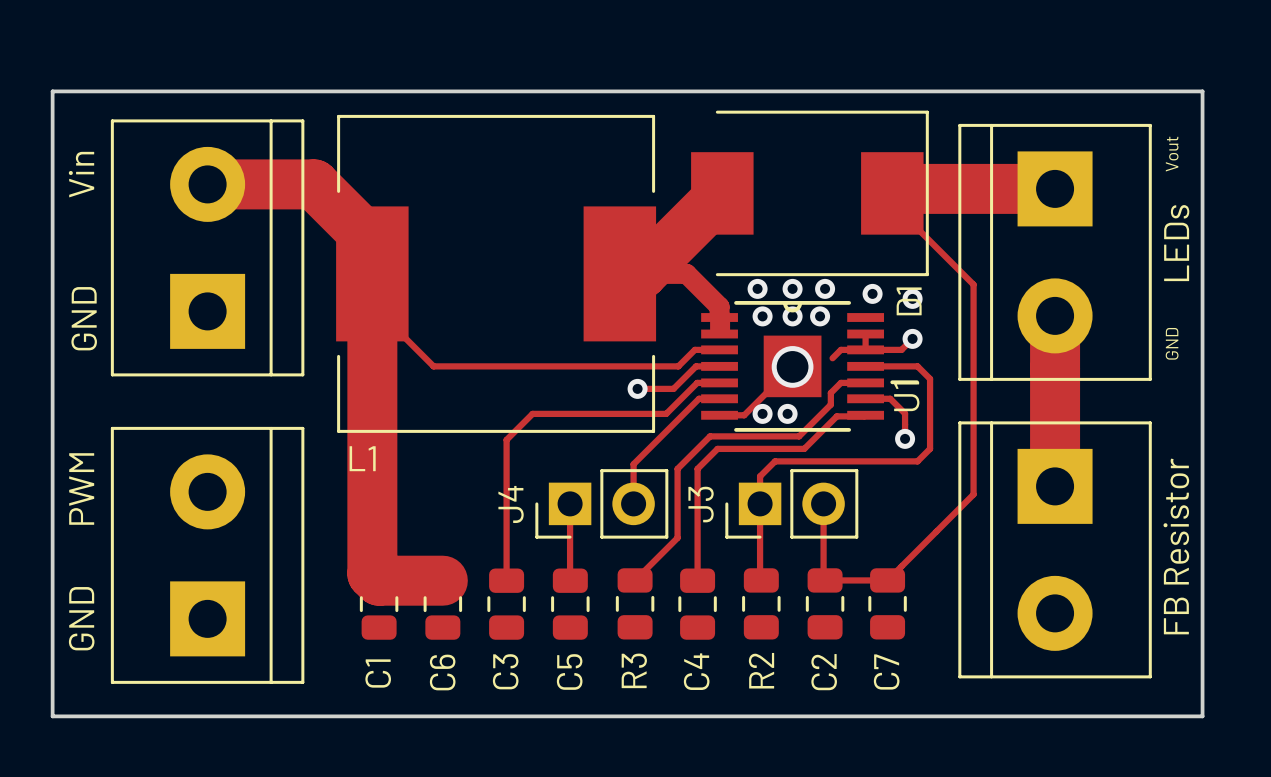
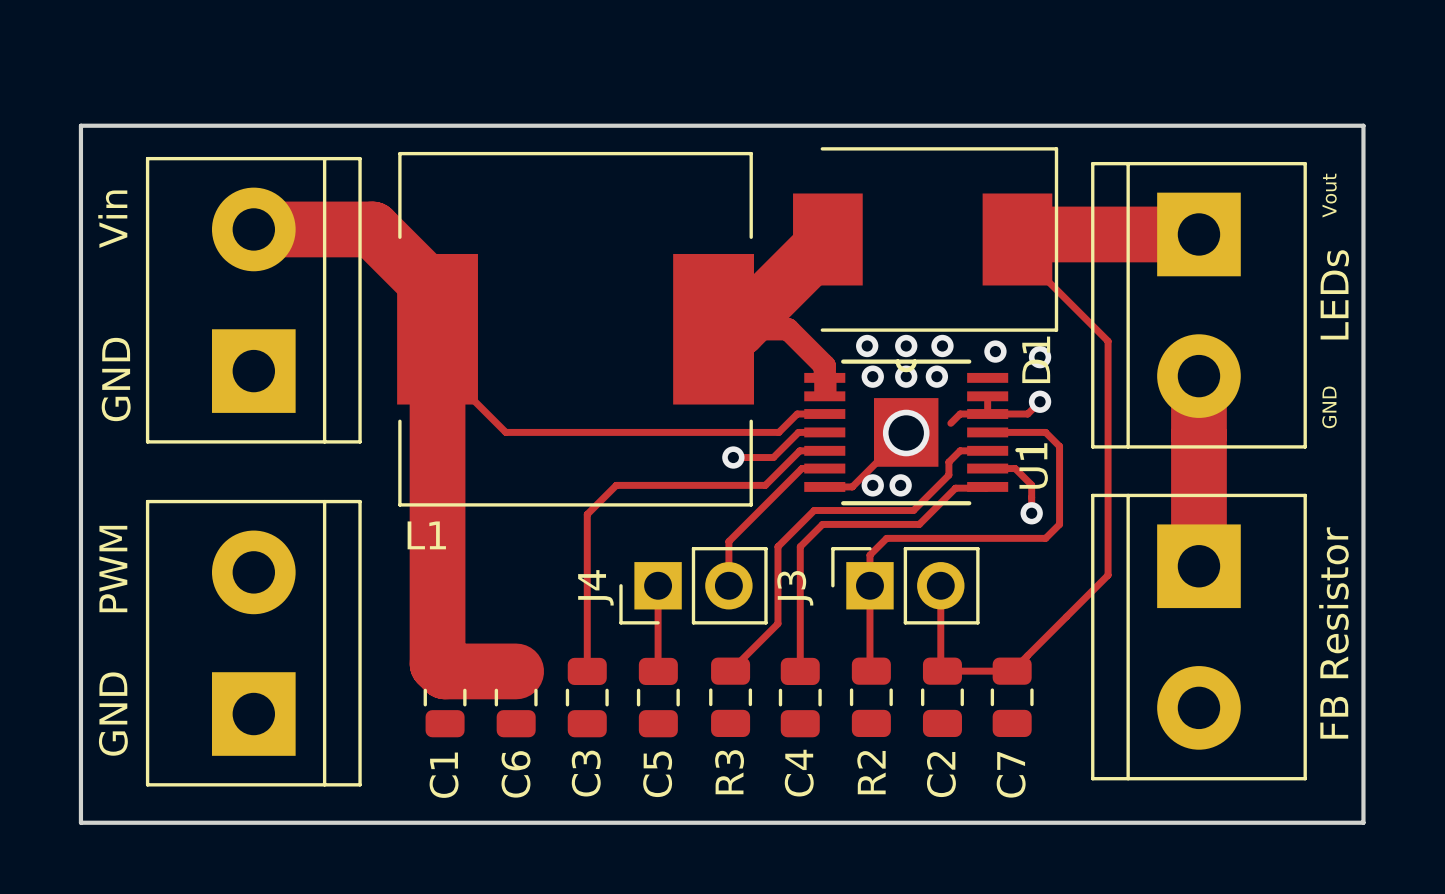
J3 footprint: [725, 469, 859, 539] -> [831, 547, 980, 625]

